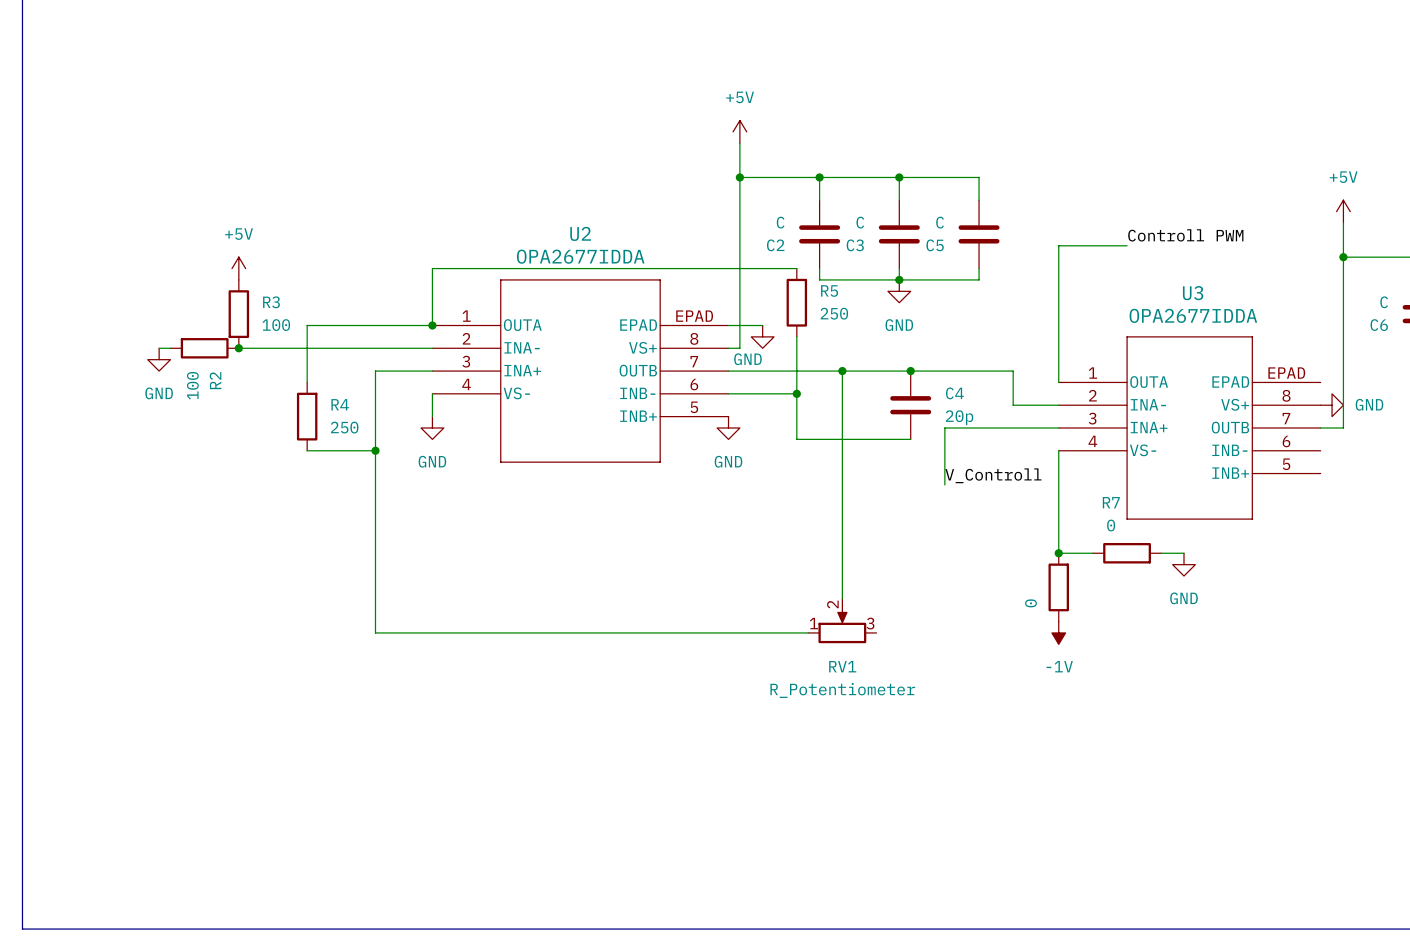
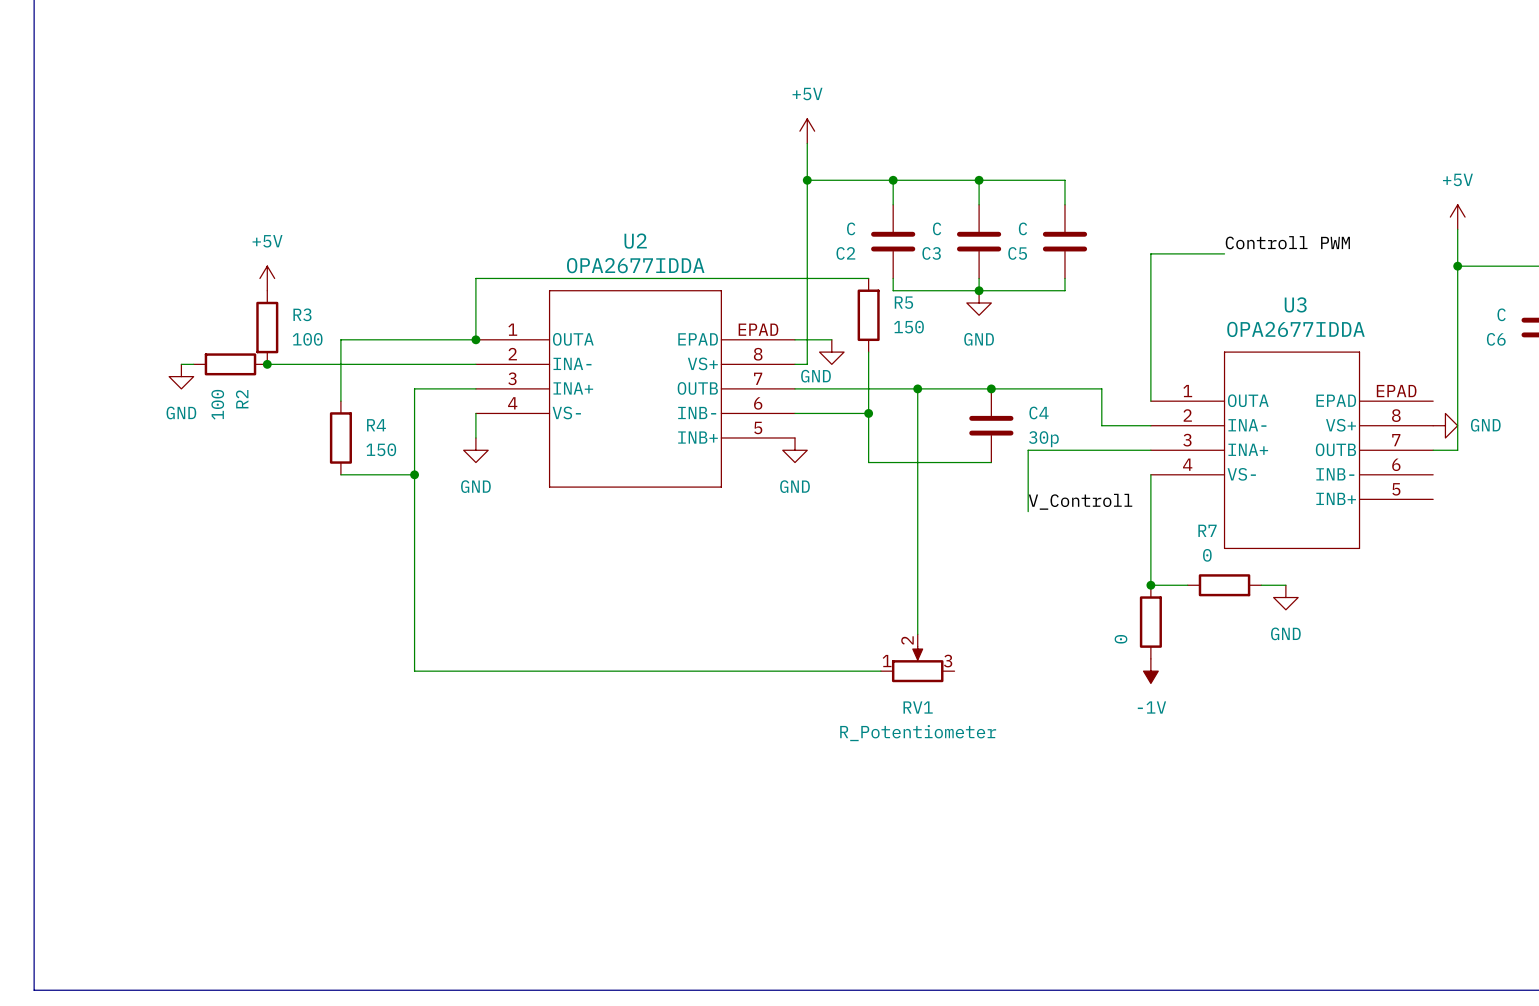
R5 value: 250 (834, 313) -> 150 (908, 327)
C4 value: 20p (959, 417) -> 30p (1043, 439)
R4 value: 250 (344, 427) -> 150 (381, 449)

